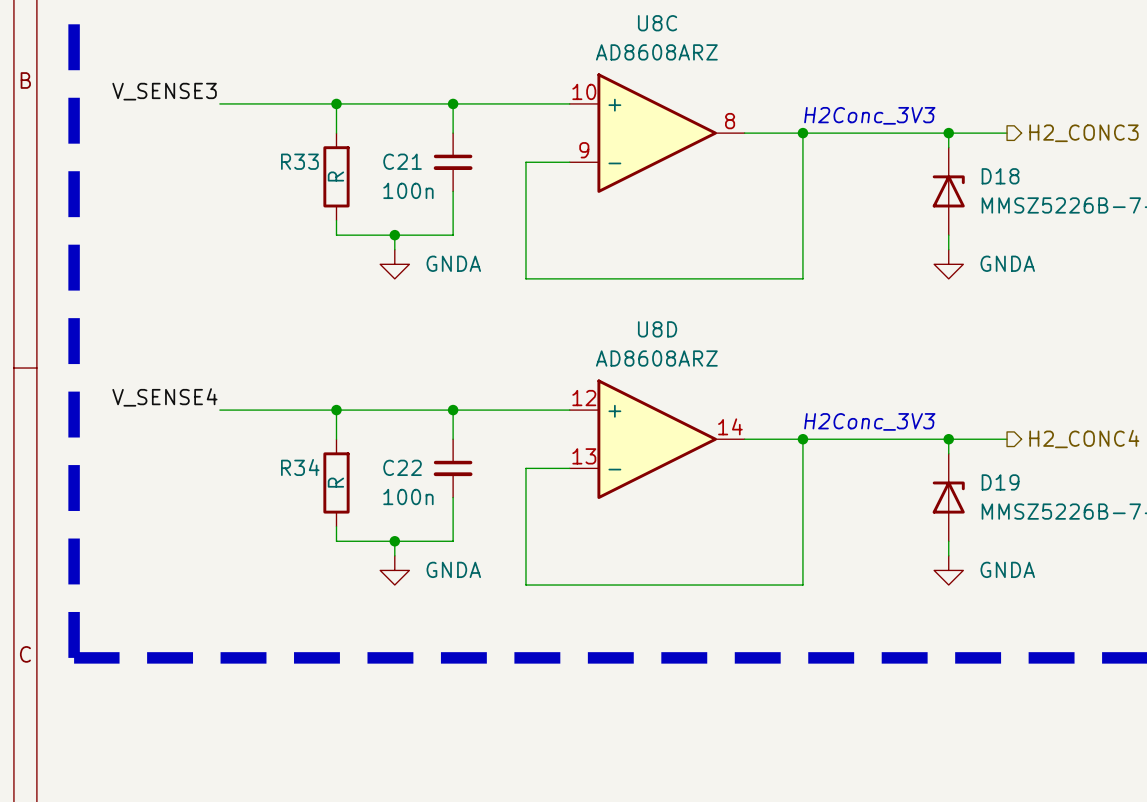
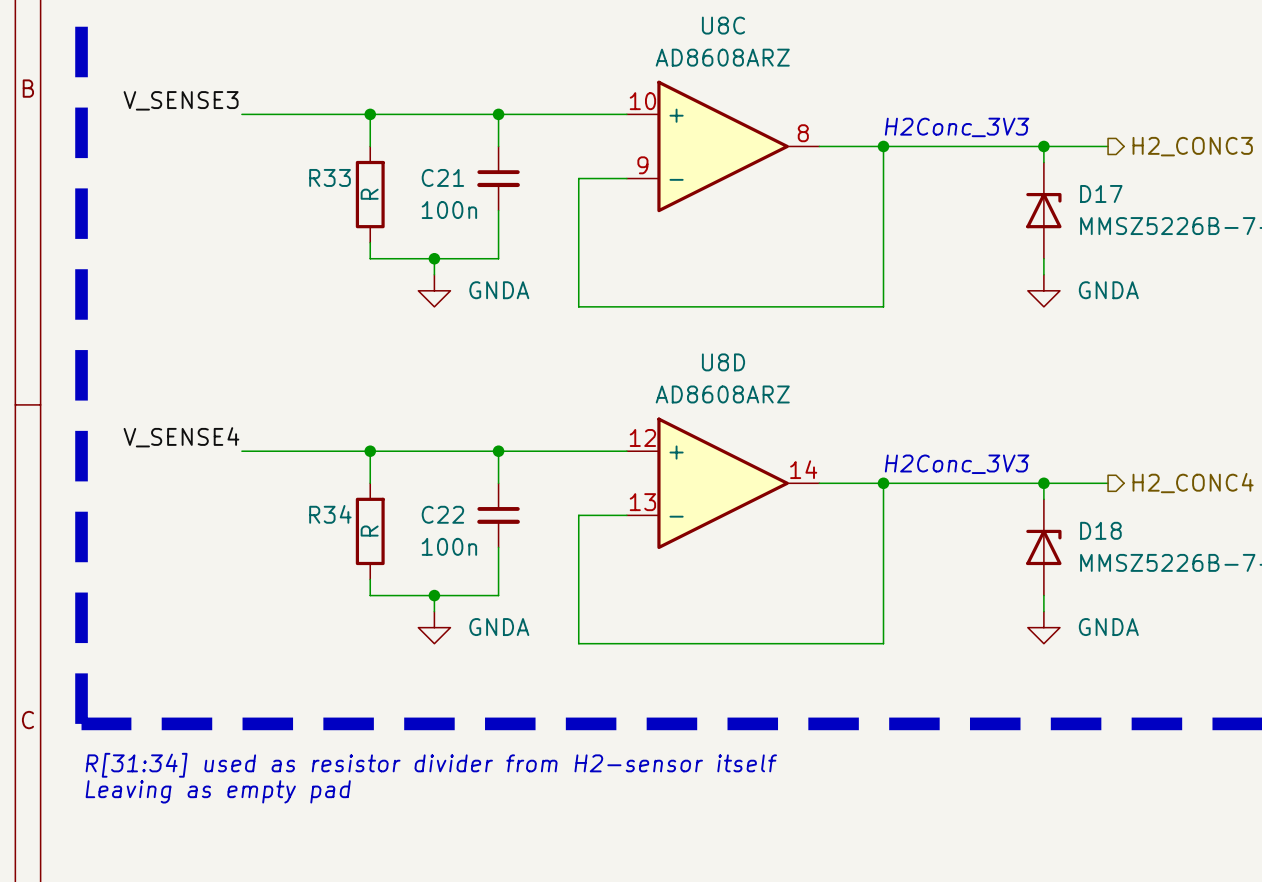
D18 name: D18 (1000, 176) -> D17 (1101, 193)
D19 name: D19 (1000, 482) -> D18 (1100, 530)
text: none -> R[31:34] used as resistor divider from H2-sensor itself (431, 765)
text: none -> Leaving as empty pad (218, 791)

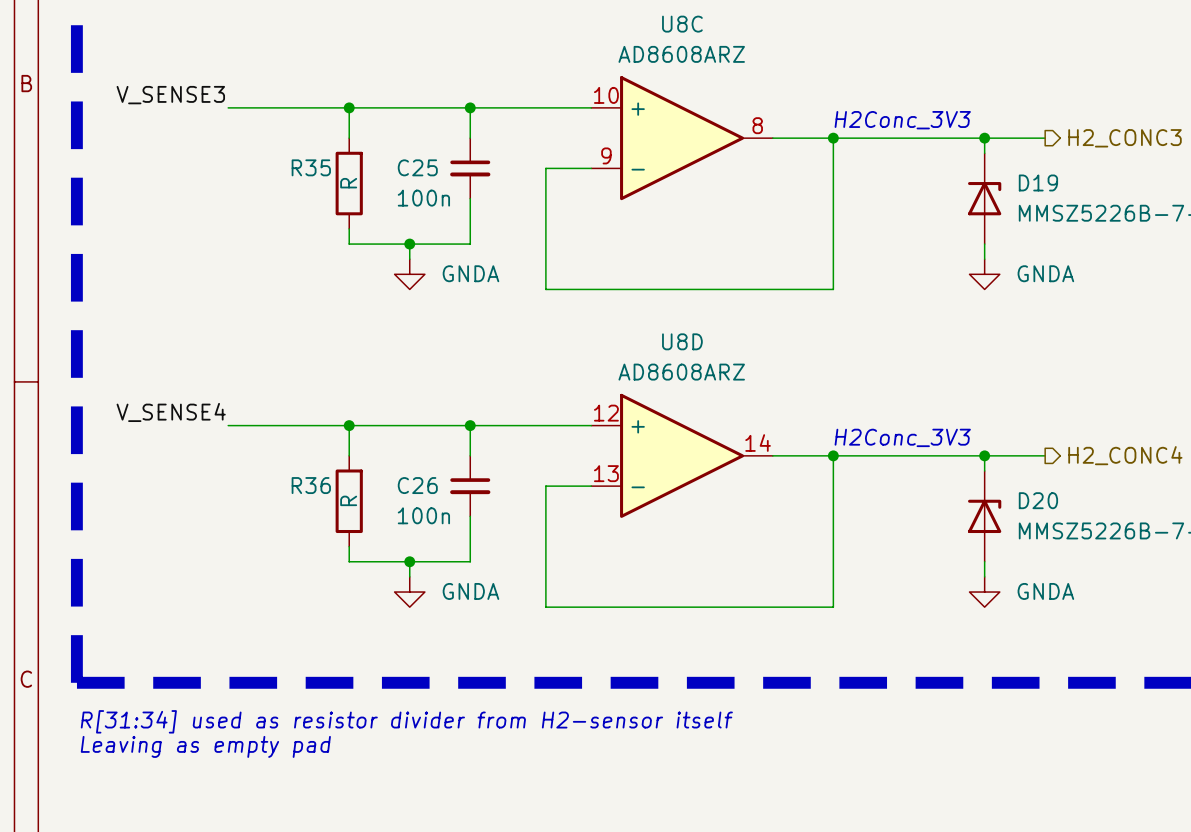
R33 name: R33 (330, 177) -> R35 (311, 167)
C21 name: C21 (442, 177) -> C25 (417, 167)
D17 name: D17 (1101, 193) -> D19 (1038, 182)
R34 name: R34 (330, 514) -> R36 (311, 485)
C22 name: C22 (442, 514) -> C26 (417, 485)
D18 name: D18 (1100, 530) -> D20 (1038, 500)

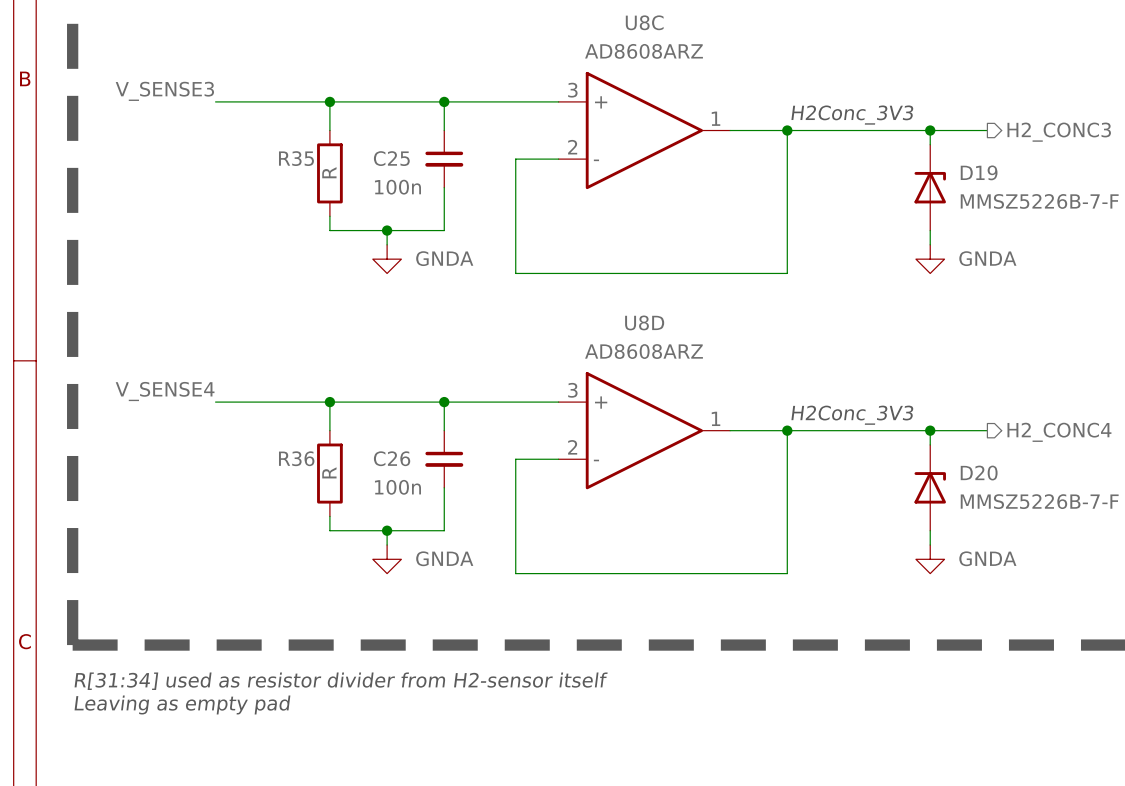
U8C pin number: 10 (606, 95) -> 3 (572, 90)
U8C pin number: 8 (757, 125) -> 1 (716, 118)
U8C pin number: 9 (606, 155) -> 2 (572, 147)
U8D pin number: 12 (606, 413) -> 3 (572, 390)
U8D pin number: 14 (758, 443) -> 1 (716, 418)
U8D pin number: 13 (606, 473) -> 2 (572, 447)

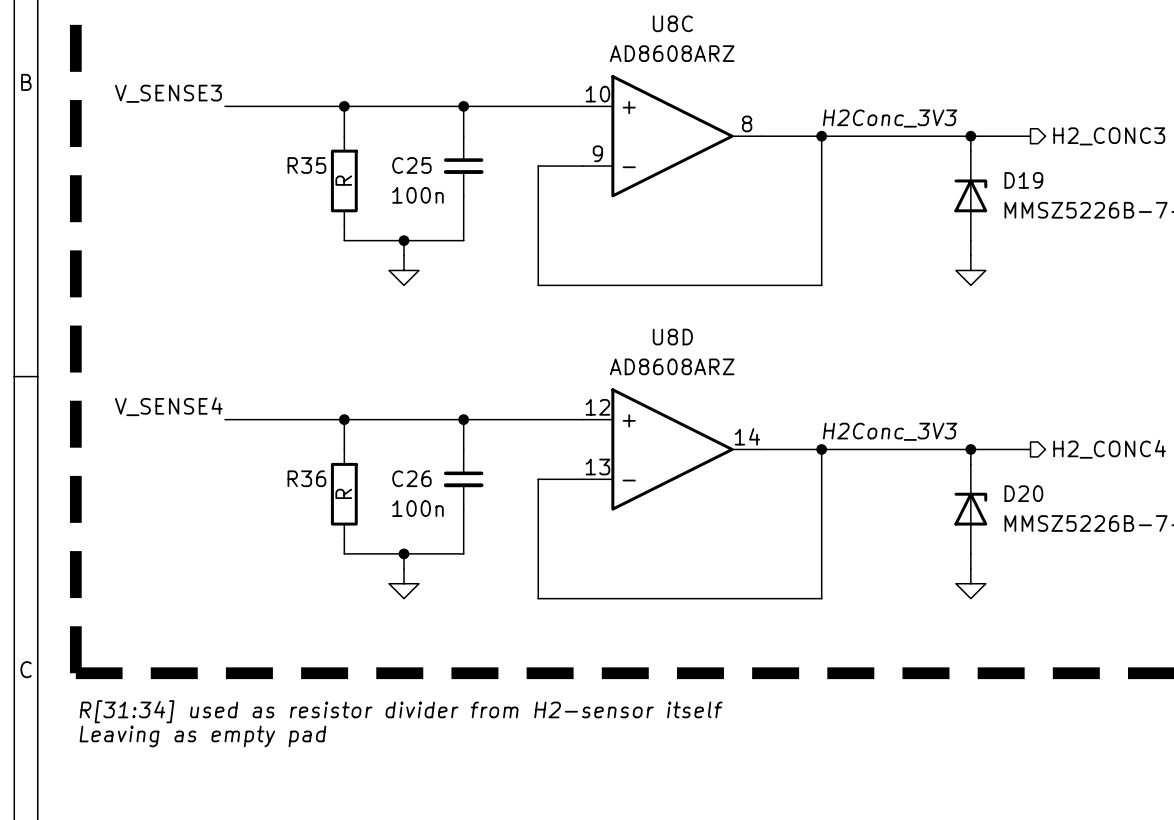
U8C pin number: 3 (572, 90) -> 10 (597, 94)
U8C pin number: 1 (716, 118) -> 8 (747, 123)
U8C pin number: 2 (572, 147) -> 9 (597, 153)
power symbol text: GNDA (444, 258) -> none
power symbol text: GNDA (987, 258) -> none
U8D pin number: 3 (572, 390) -> 12 (597, 407)
U8D pin number: 1 (716, 418) -> 14 (747, 436)
U8D pin number: 2 (572, 447) -> 13 (597, 467)
power symbol text: GNDA (444, 558) -> none
power symbol text: GNDA (987, 558) -> none

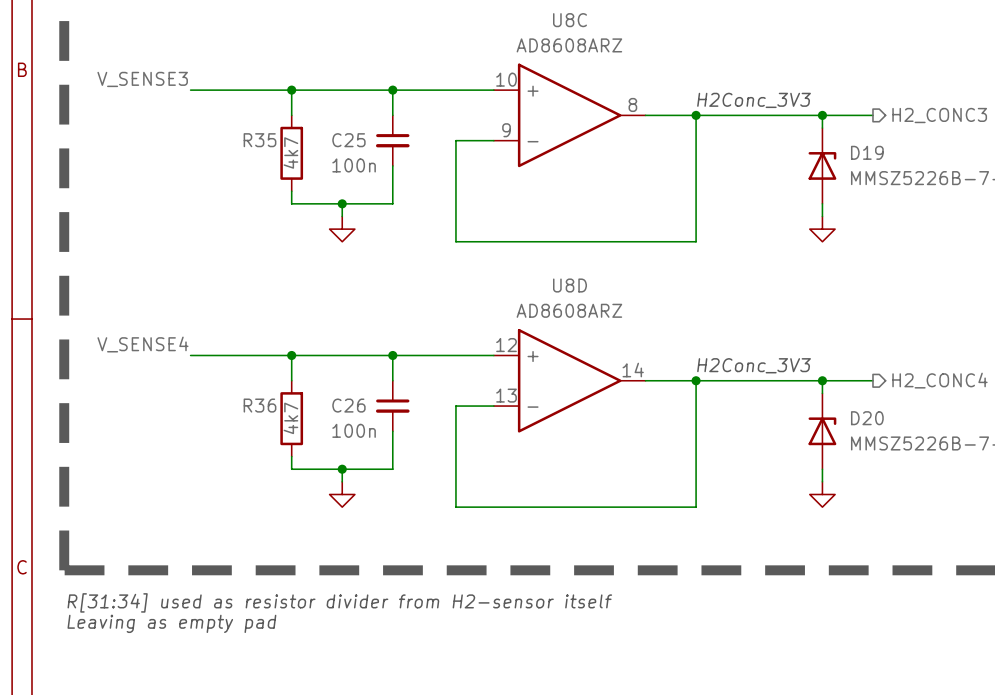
R35 value: R (343, 180) -> 4k7 (290, 153)
R36 value: R (343, 493) -> 4k7 (290, 418)

